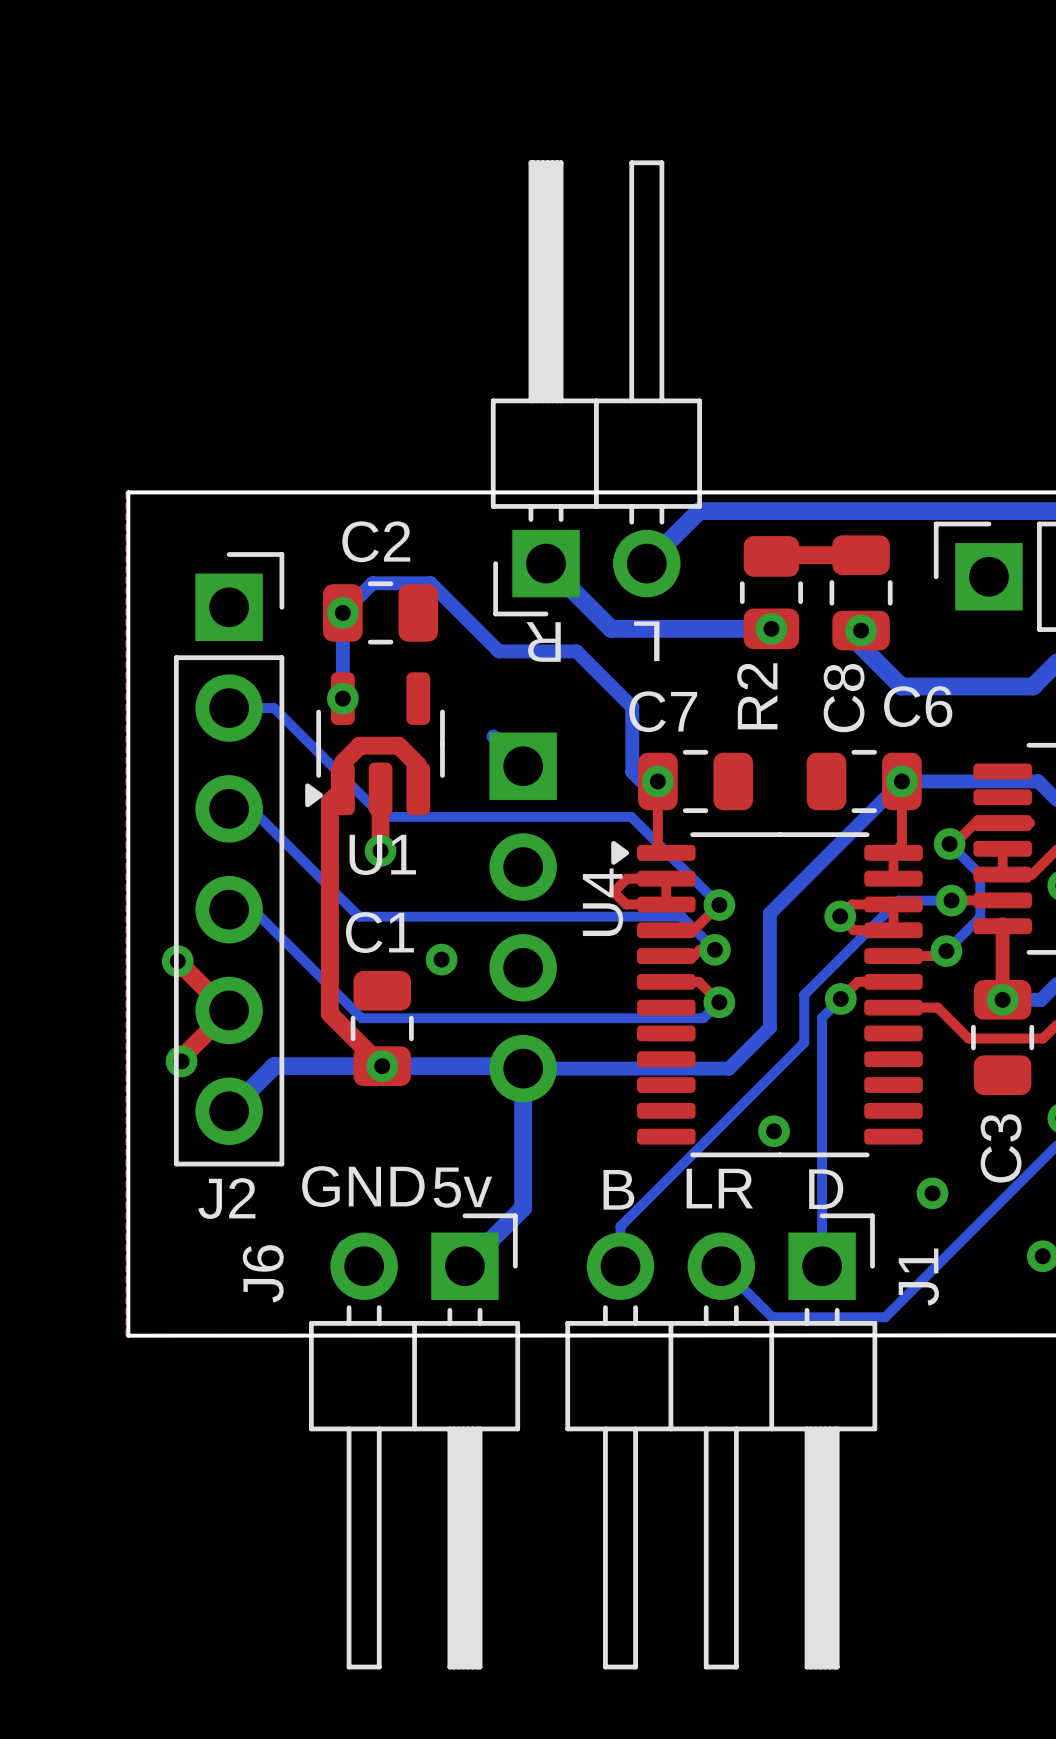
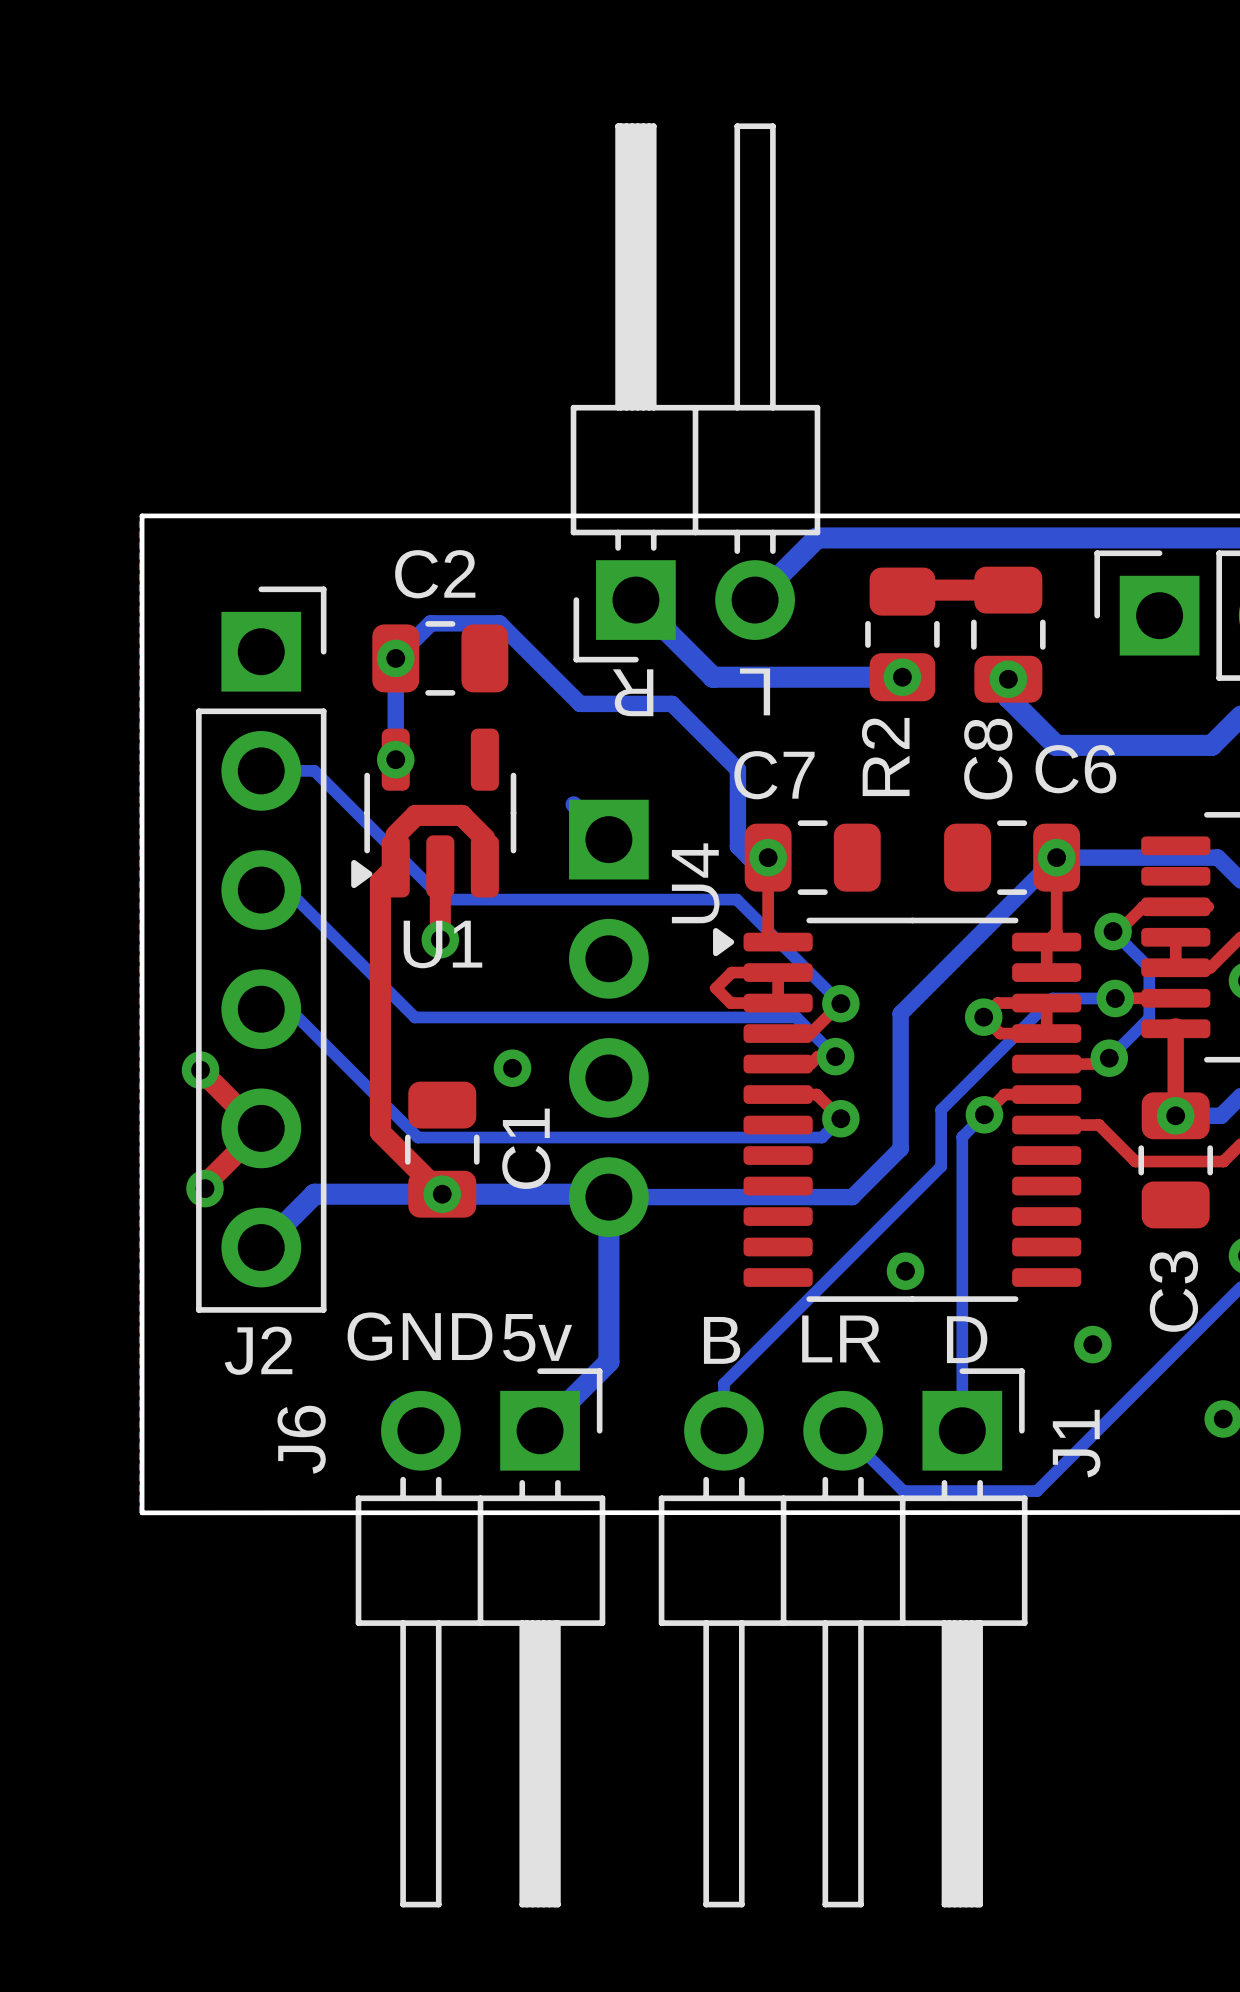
U4 name position: U4 (603, 902) -> U4 (695, 883)
C1 name rotation: 0° (379, 932) -> 90° counterclockwise (526, 1148)
C1 name position: C1 (379, 932) -> C1 (526, 1148)

